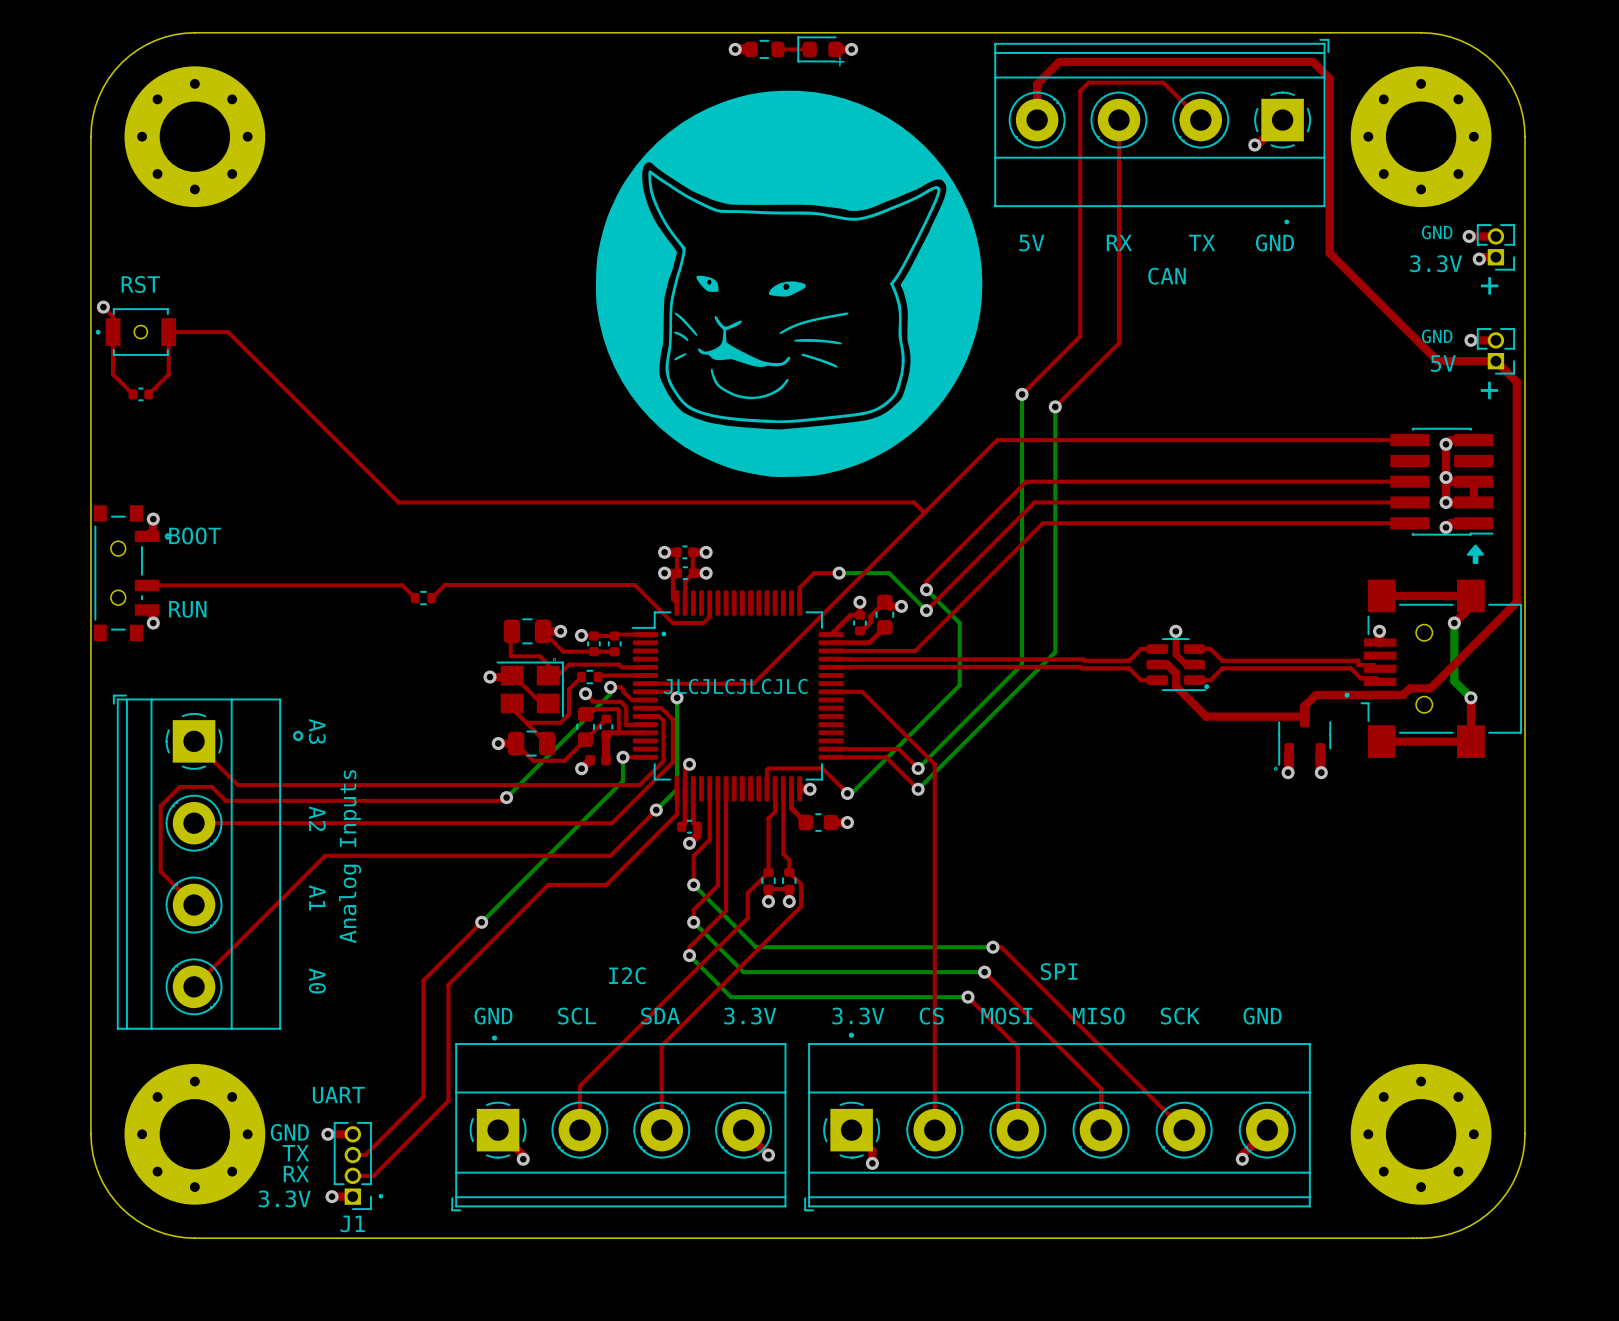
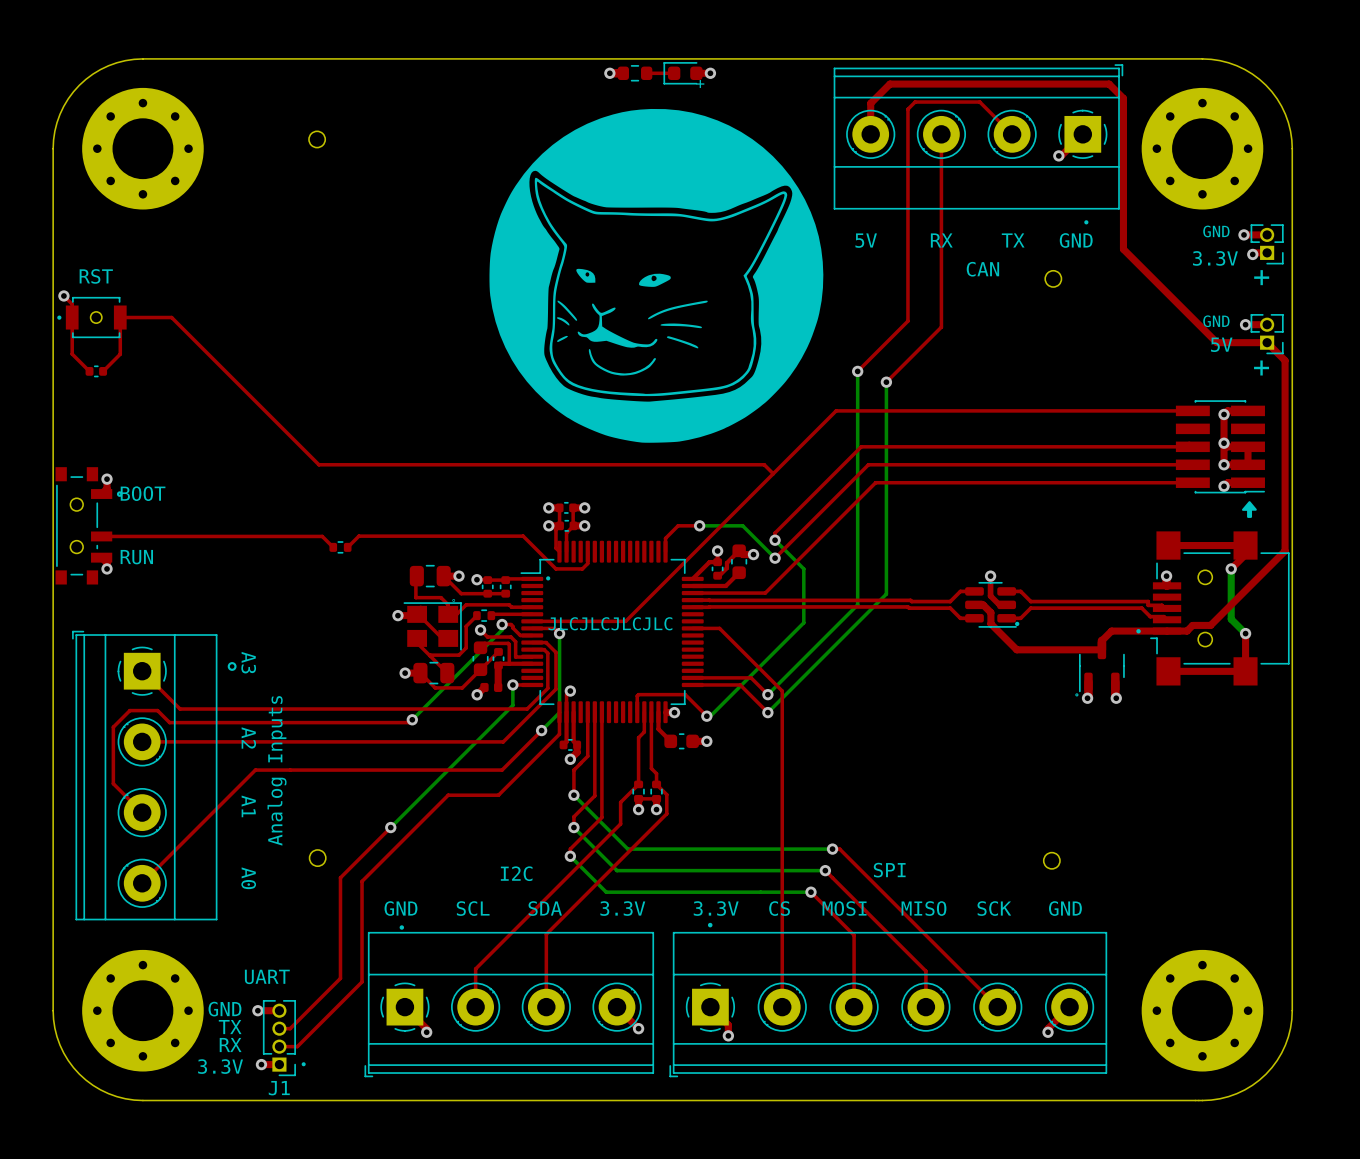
round board edge: none -> [308, 130, 326, 149]
round board edge: none -> [1044, 270, 1063, 288]
round board edge: none -> [308, 849, 327, 867]
round board edge: none -> [1043, 851, 1061, 870]

